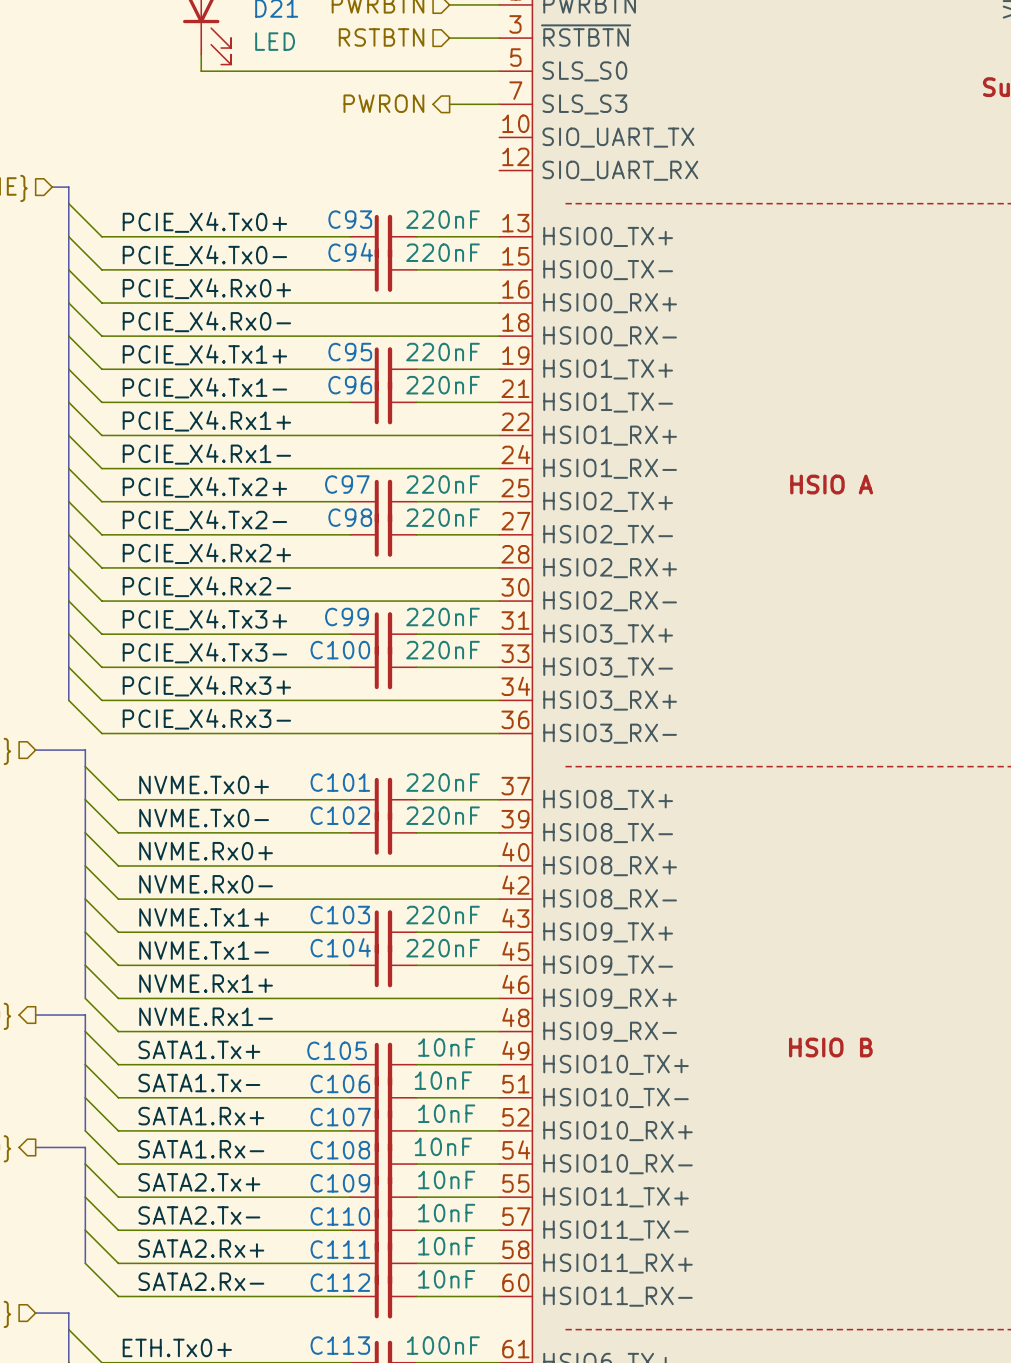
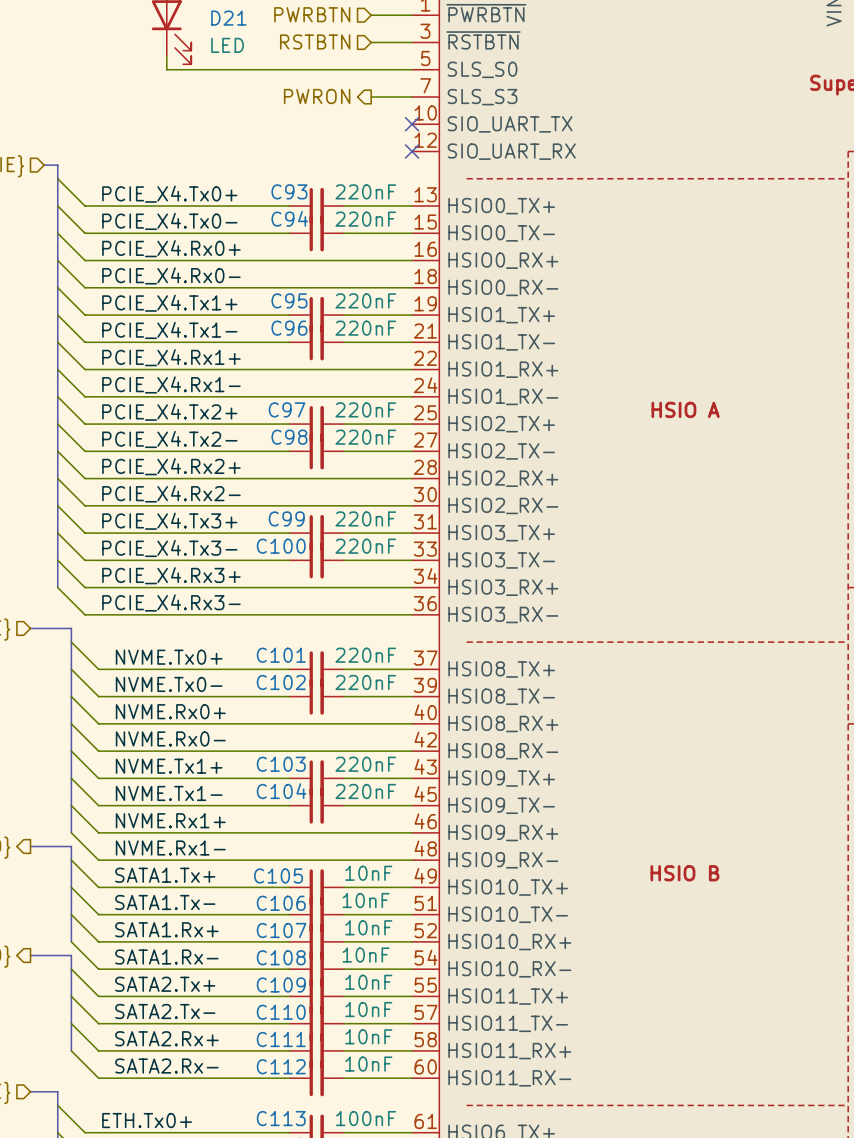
no-connect mark: none -> (412, 124)
no-connect mark: none -> (412, 151)

